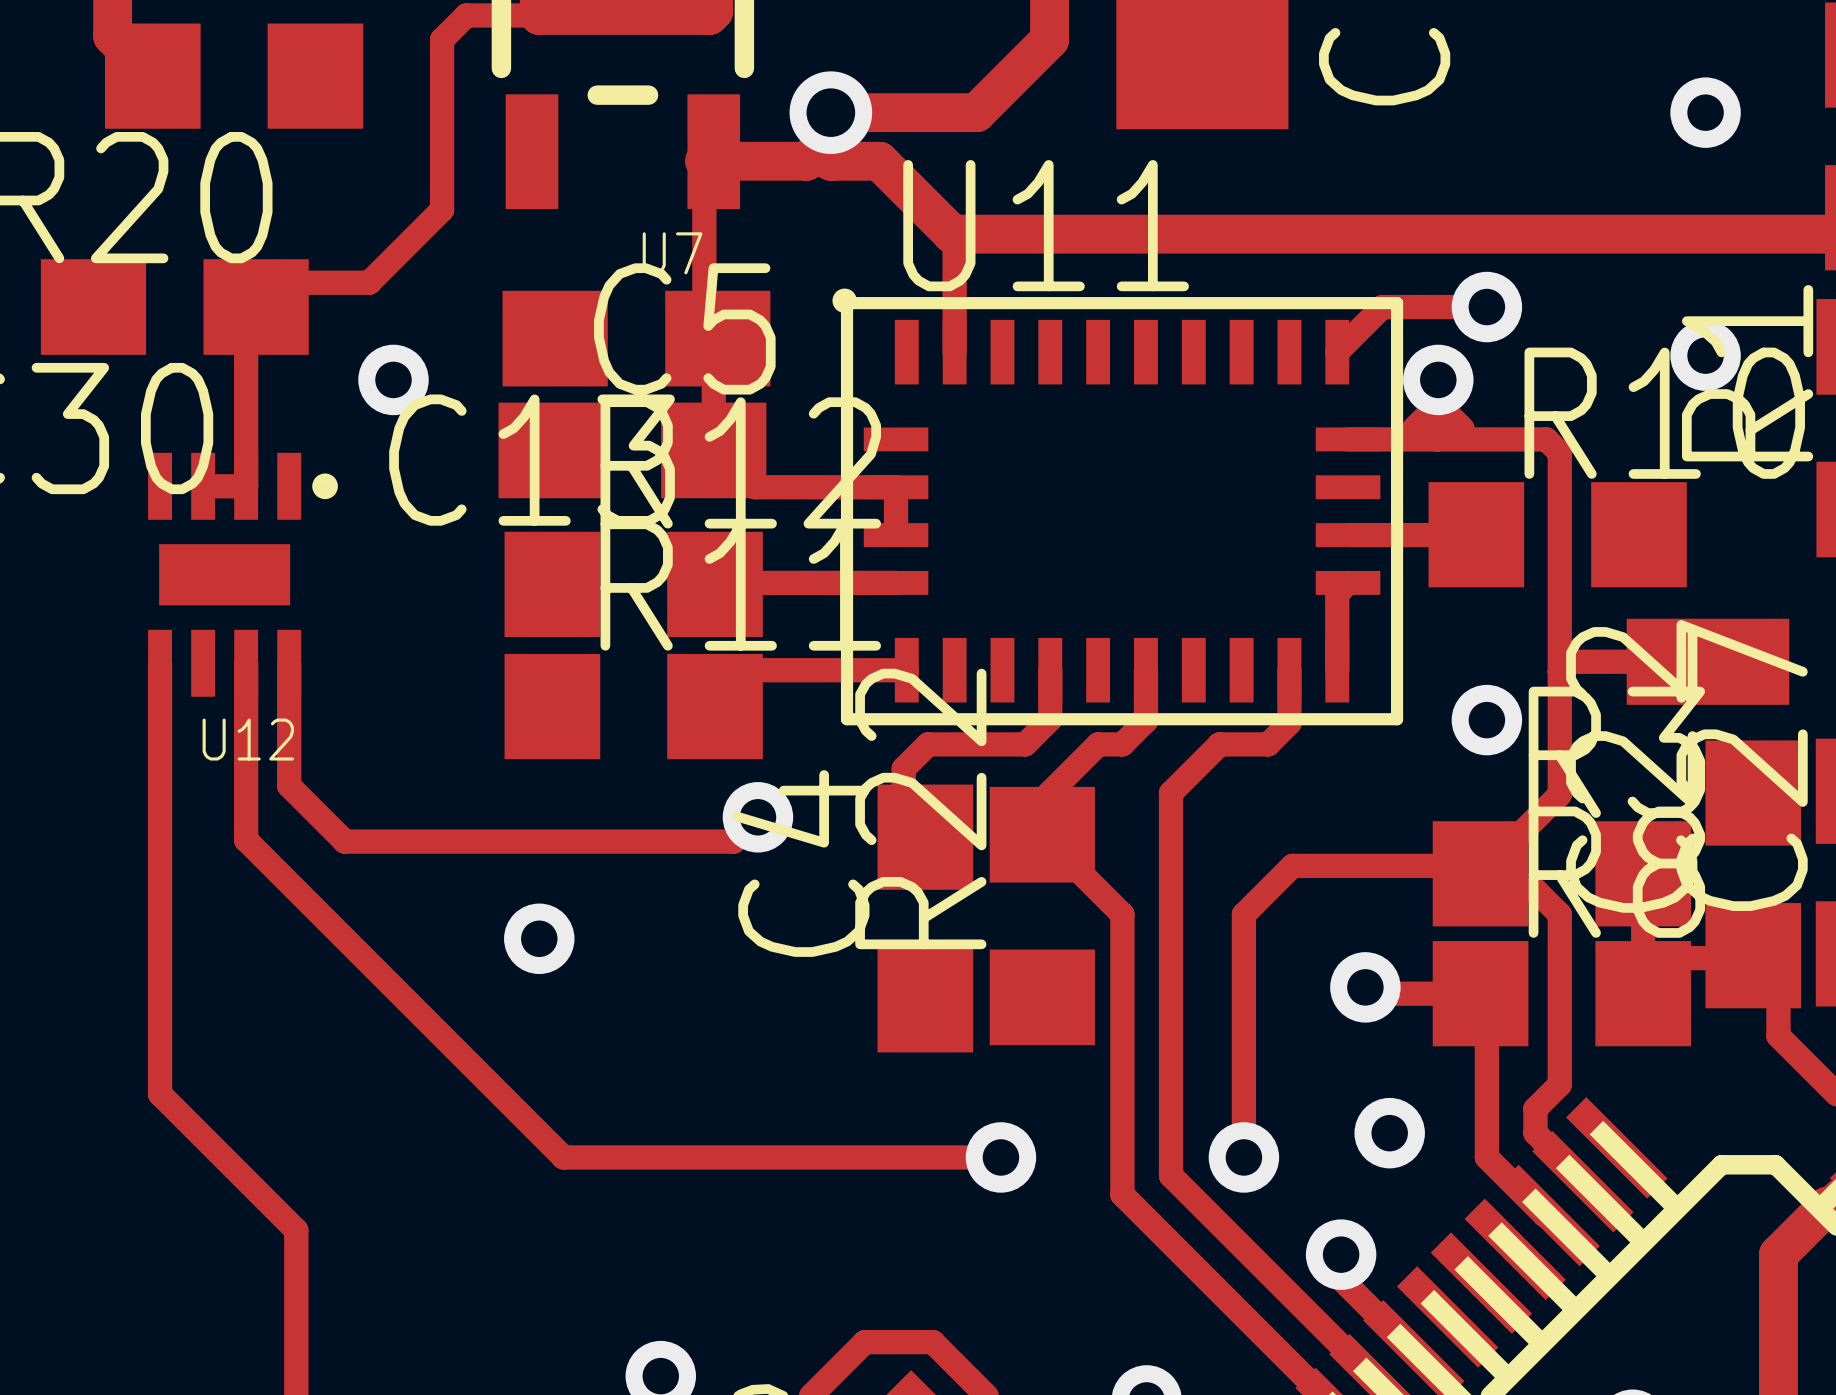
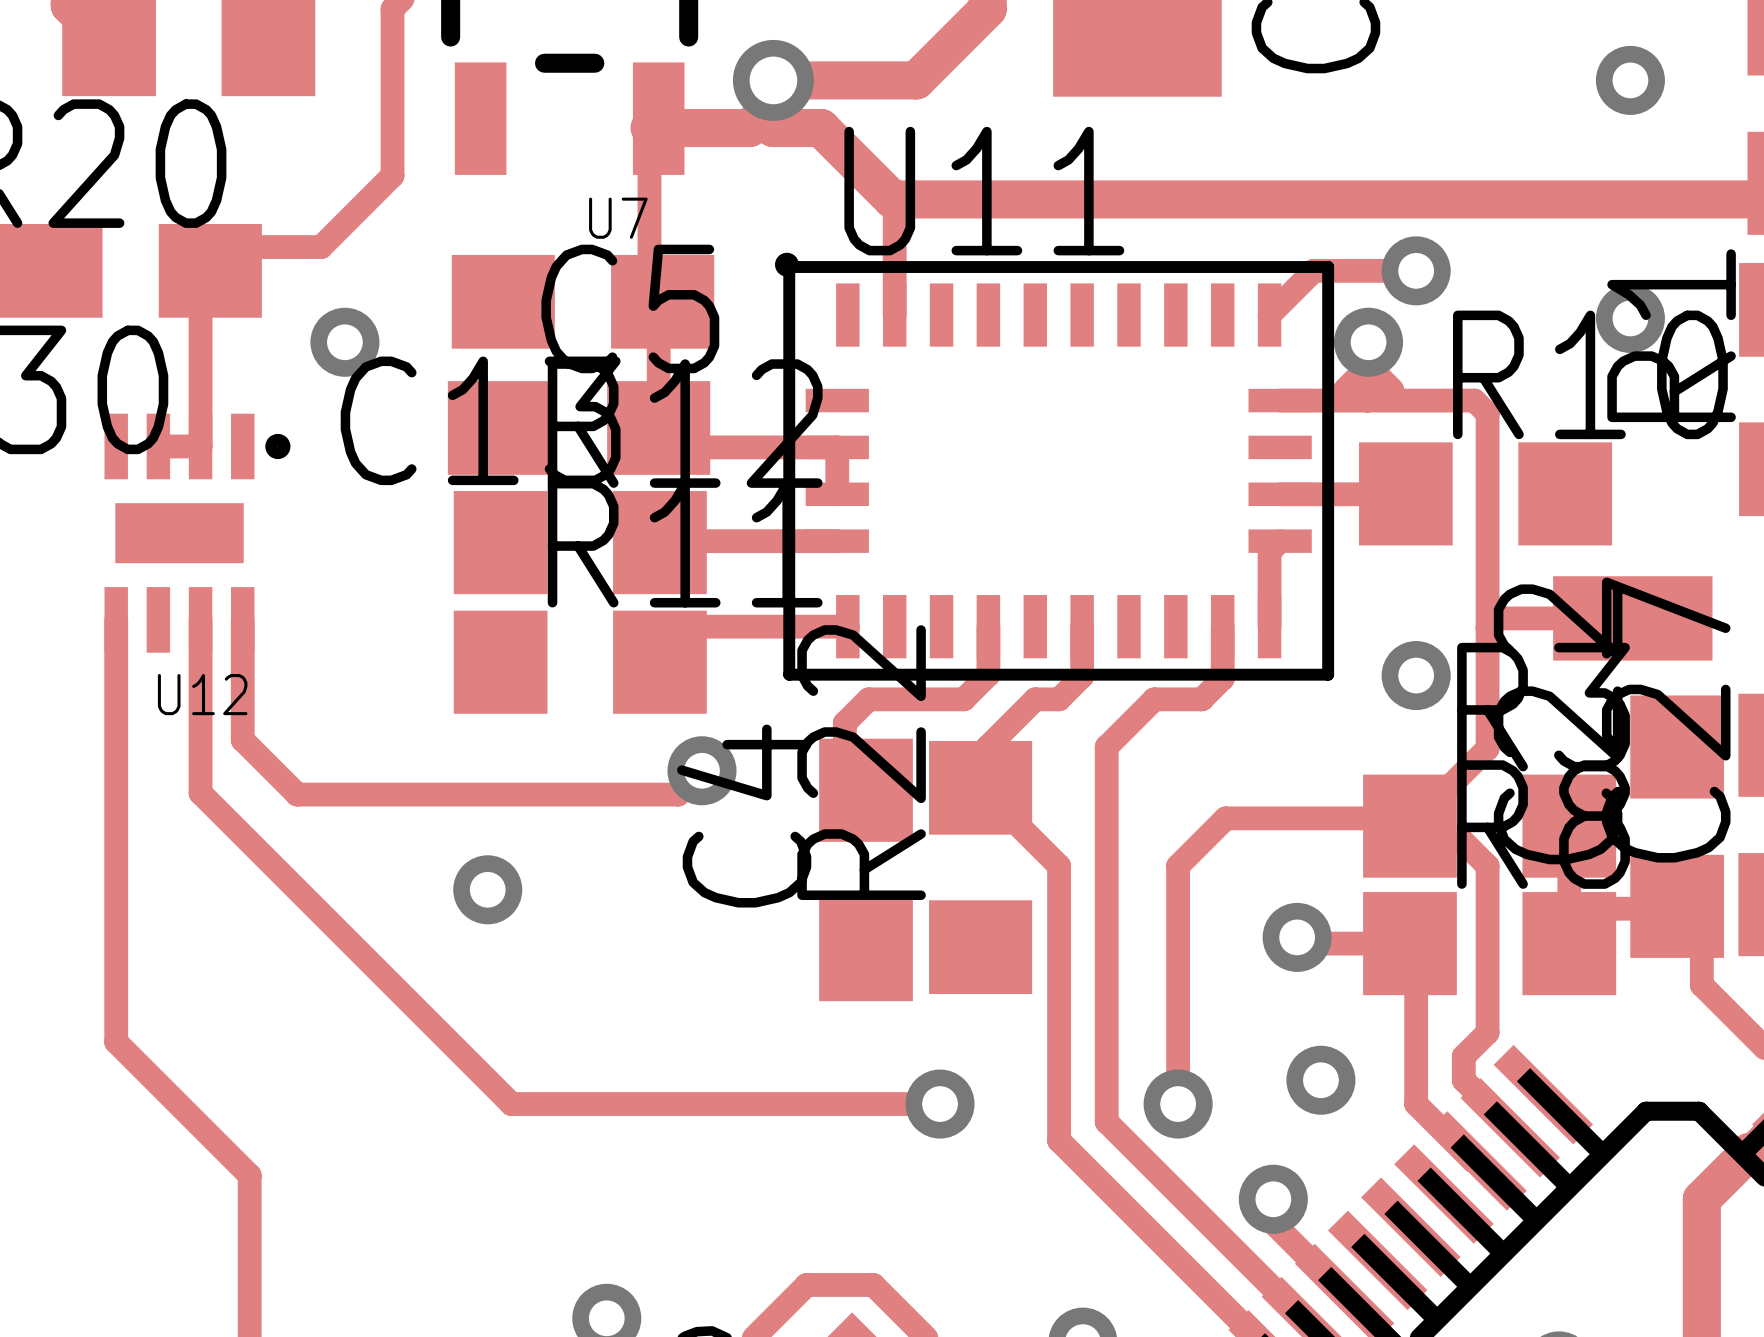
C5 position: (632, 450) -> (579, 427)

